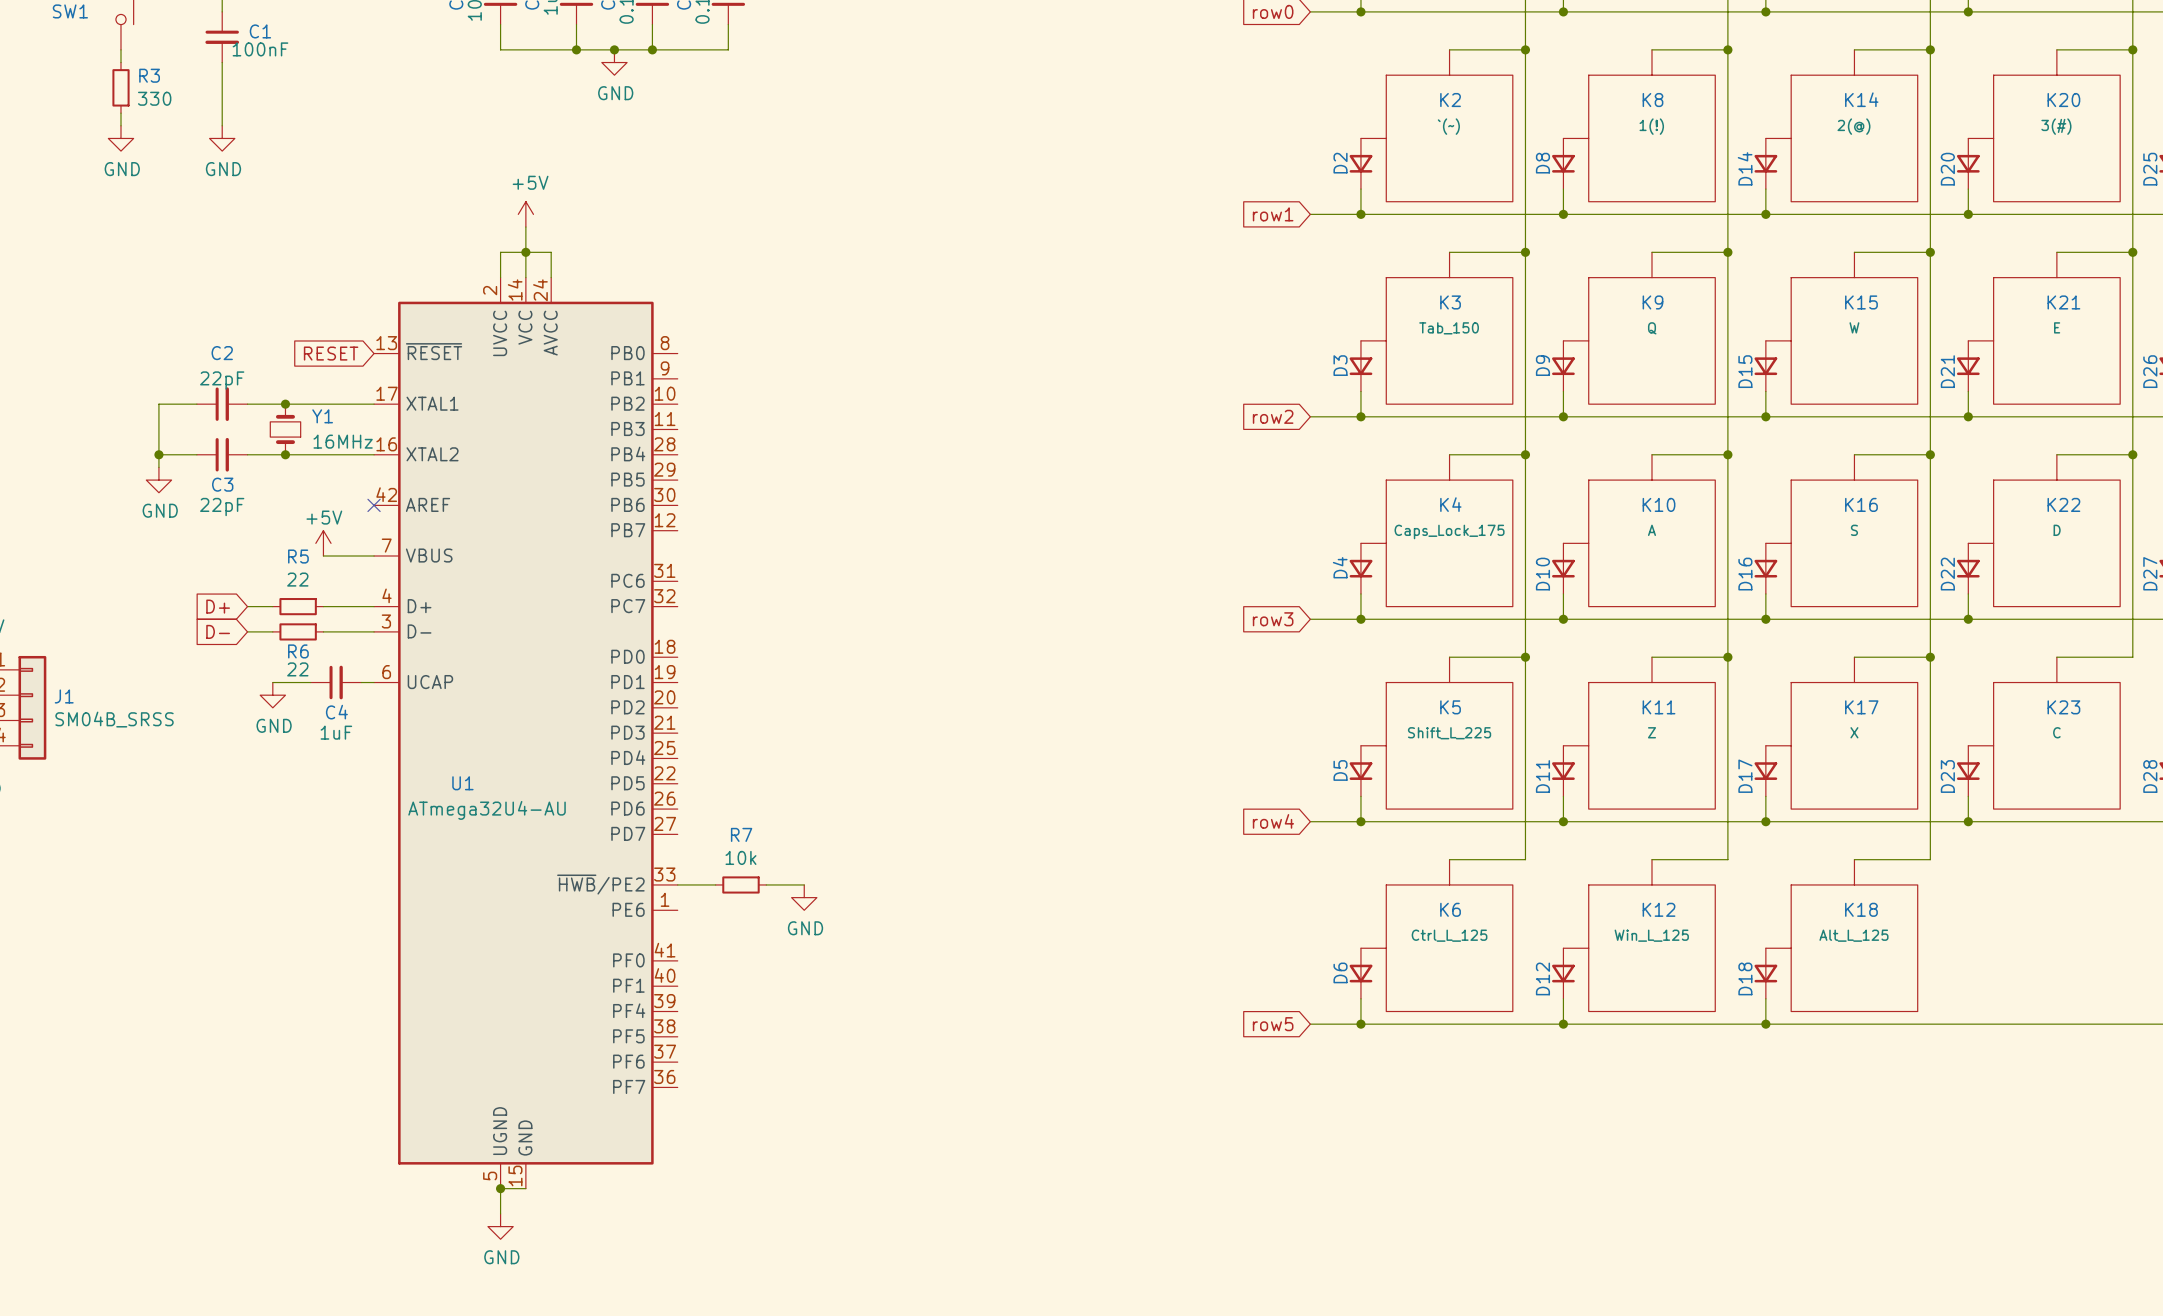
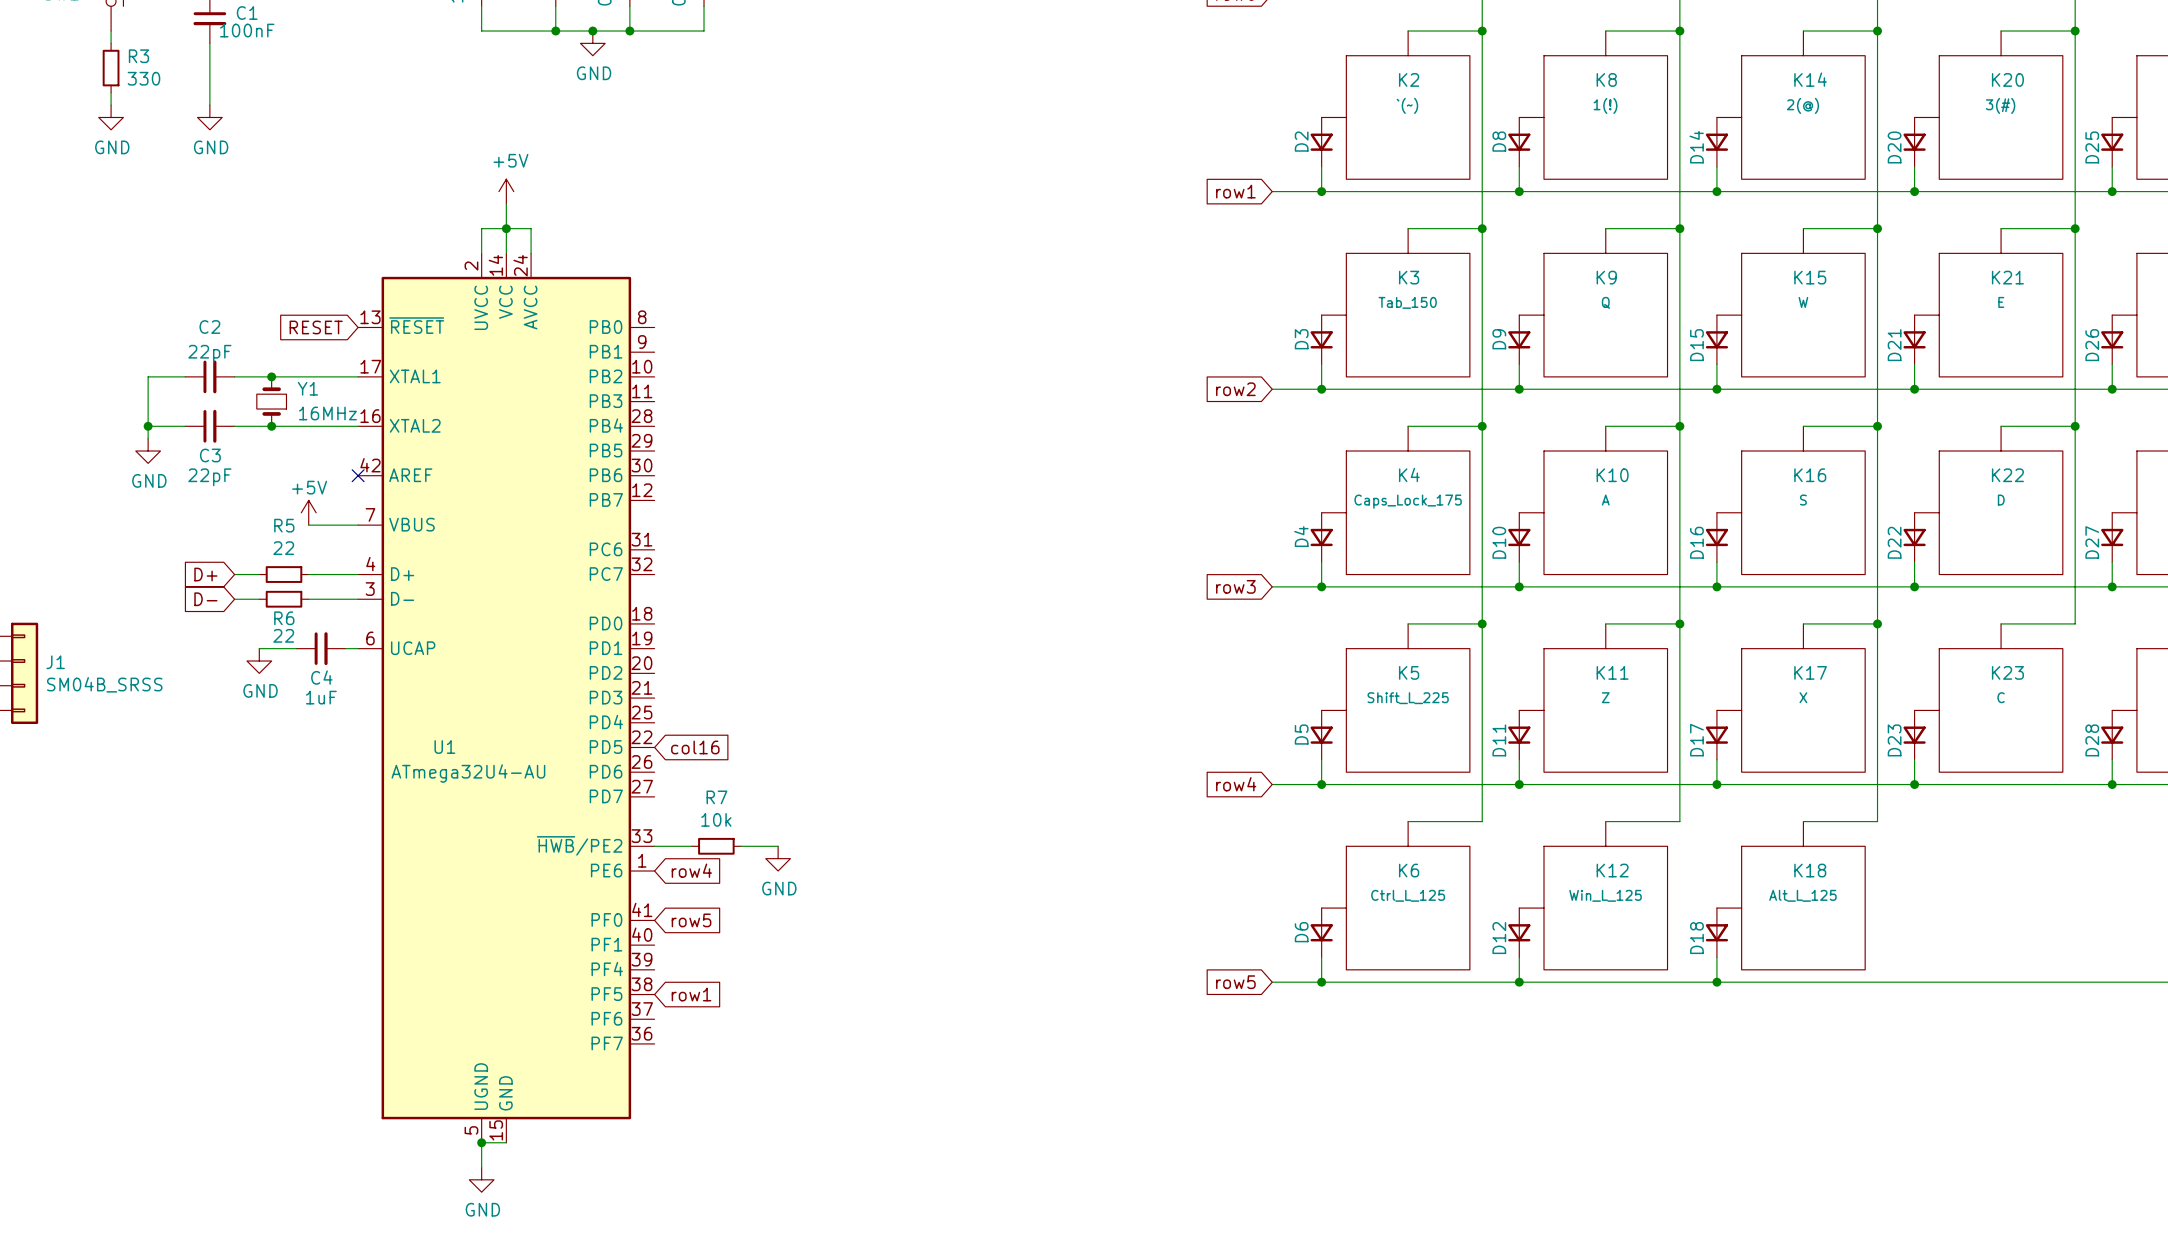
global label: none -> col16 (695, 747)
global label: none -> row4 (691, 870)
global label: none -> row5 (691, 920)
global label: none -> row1 (691, 994)

